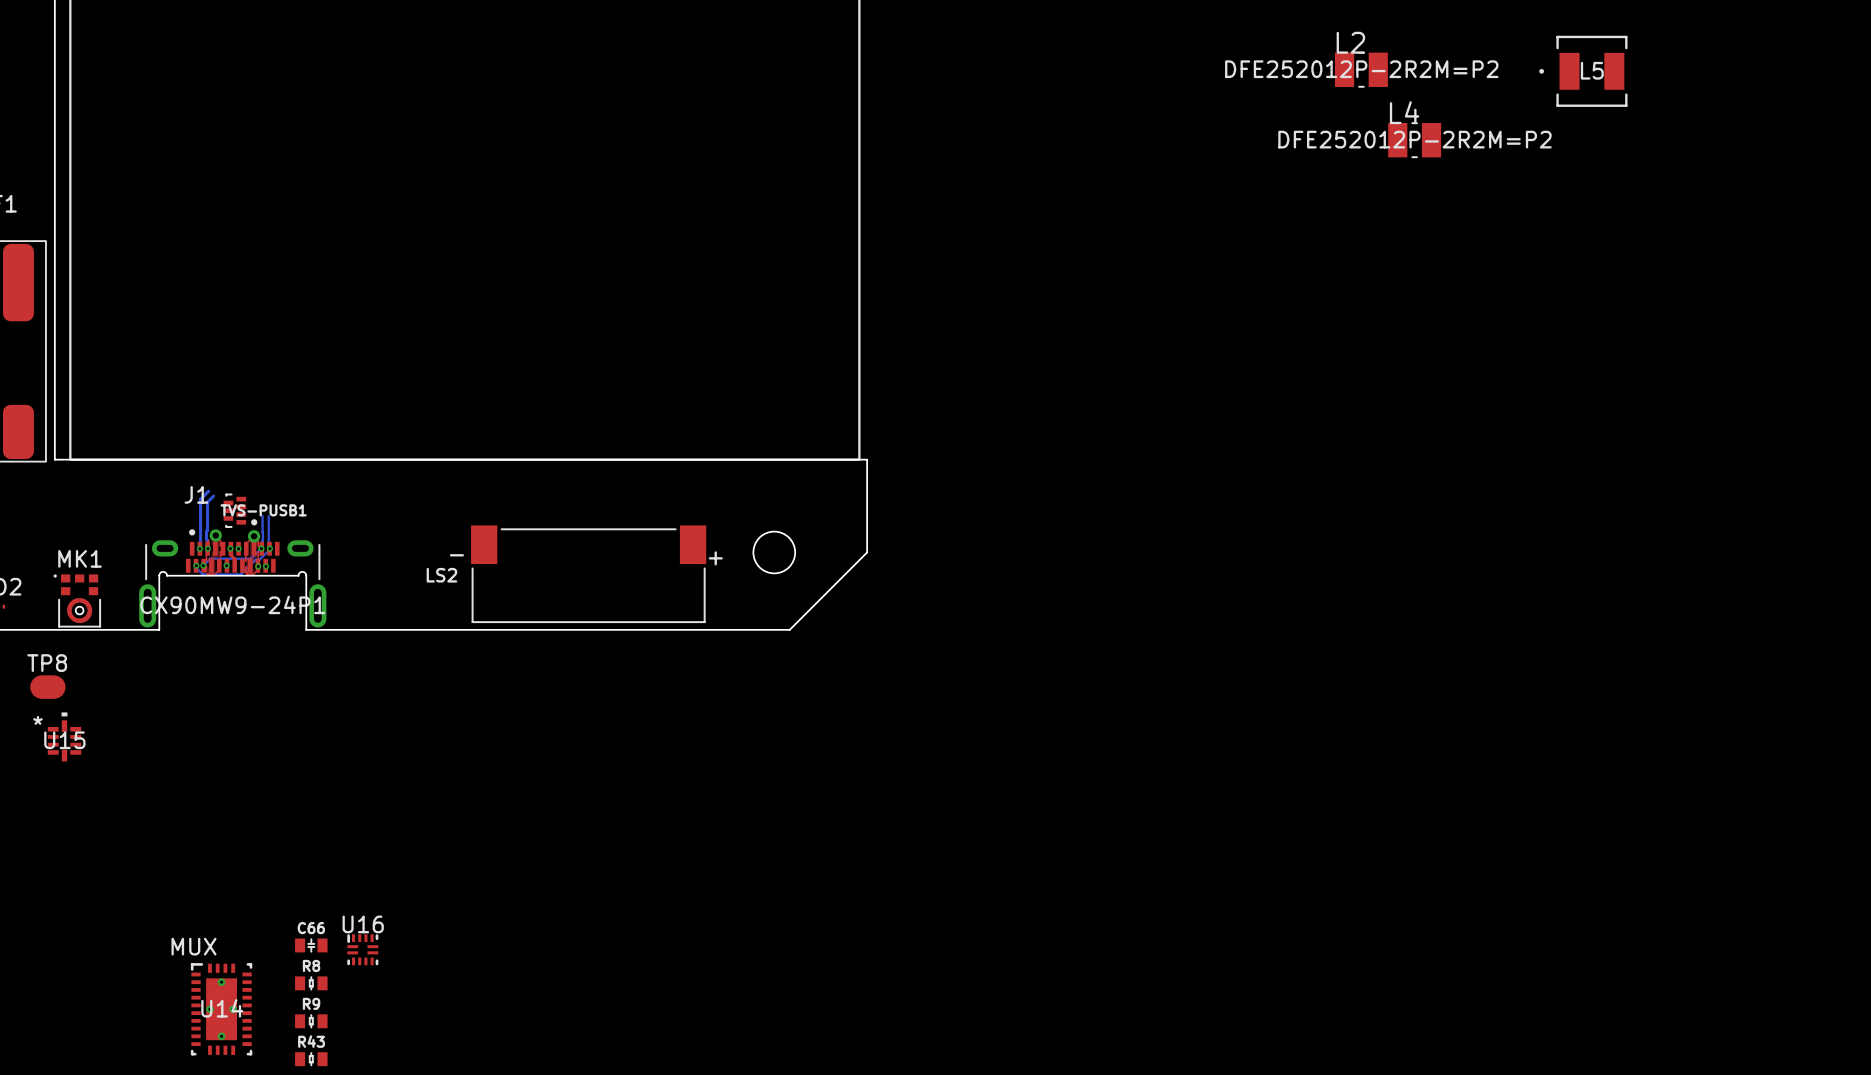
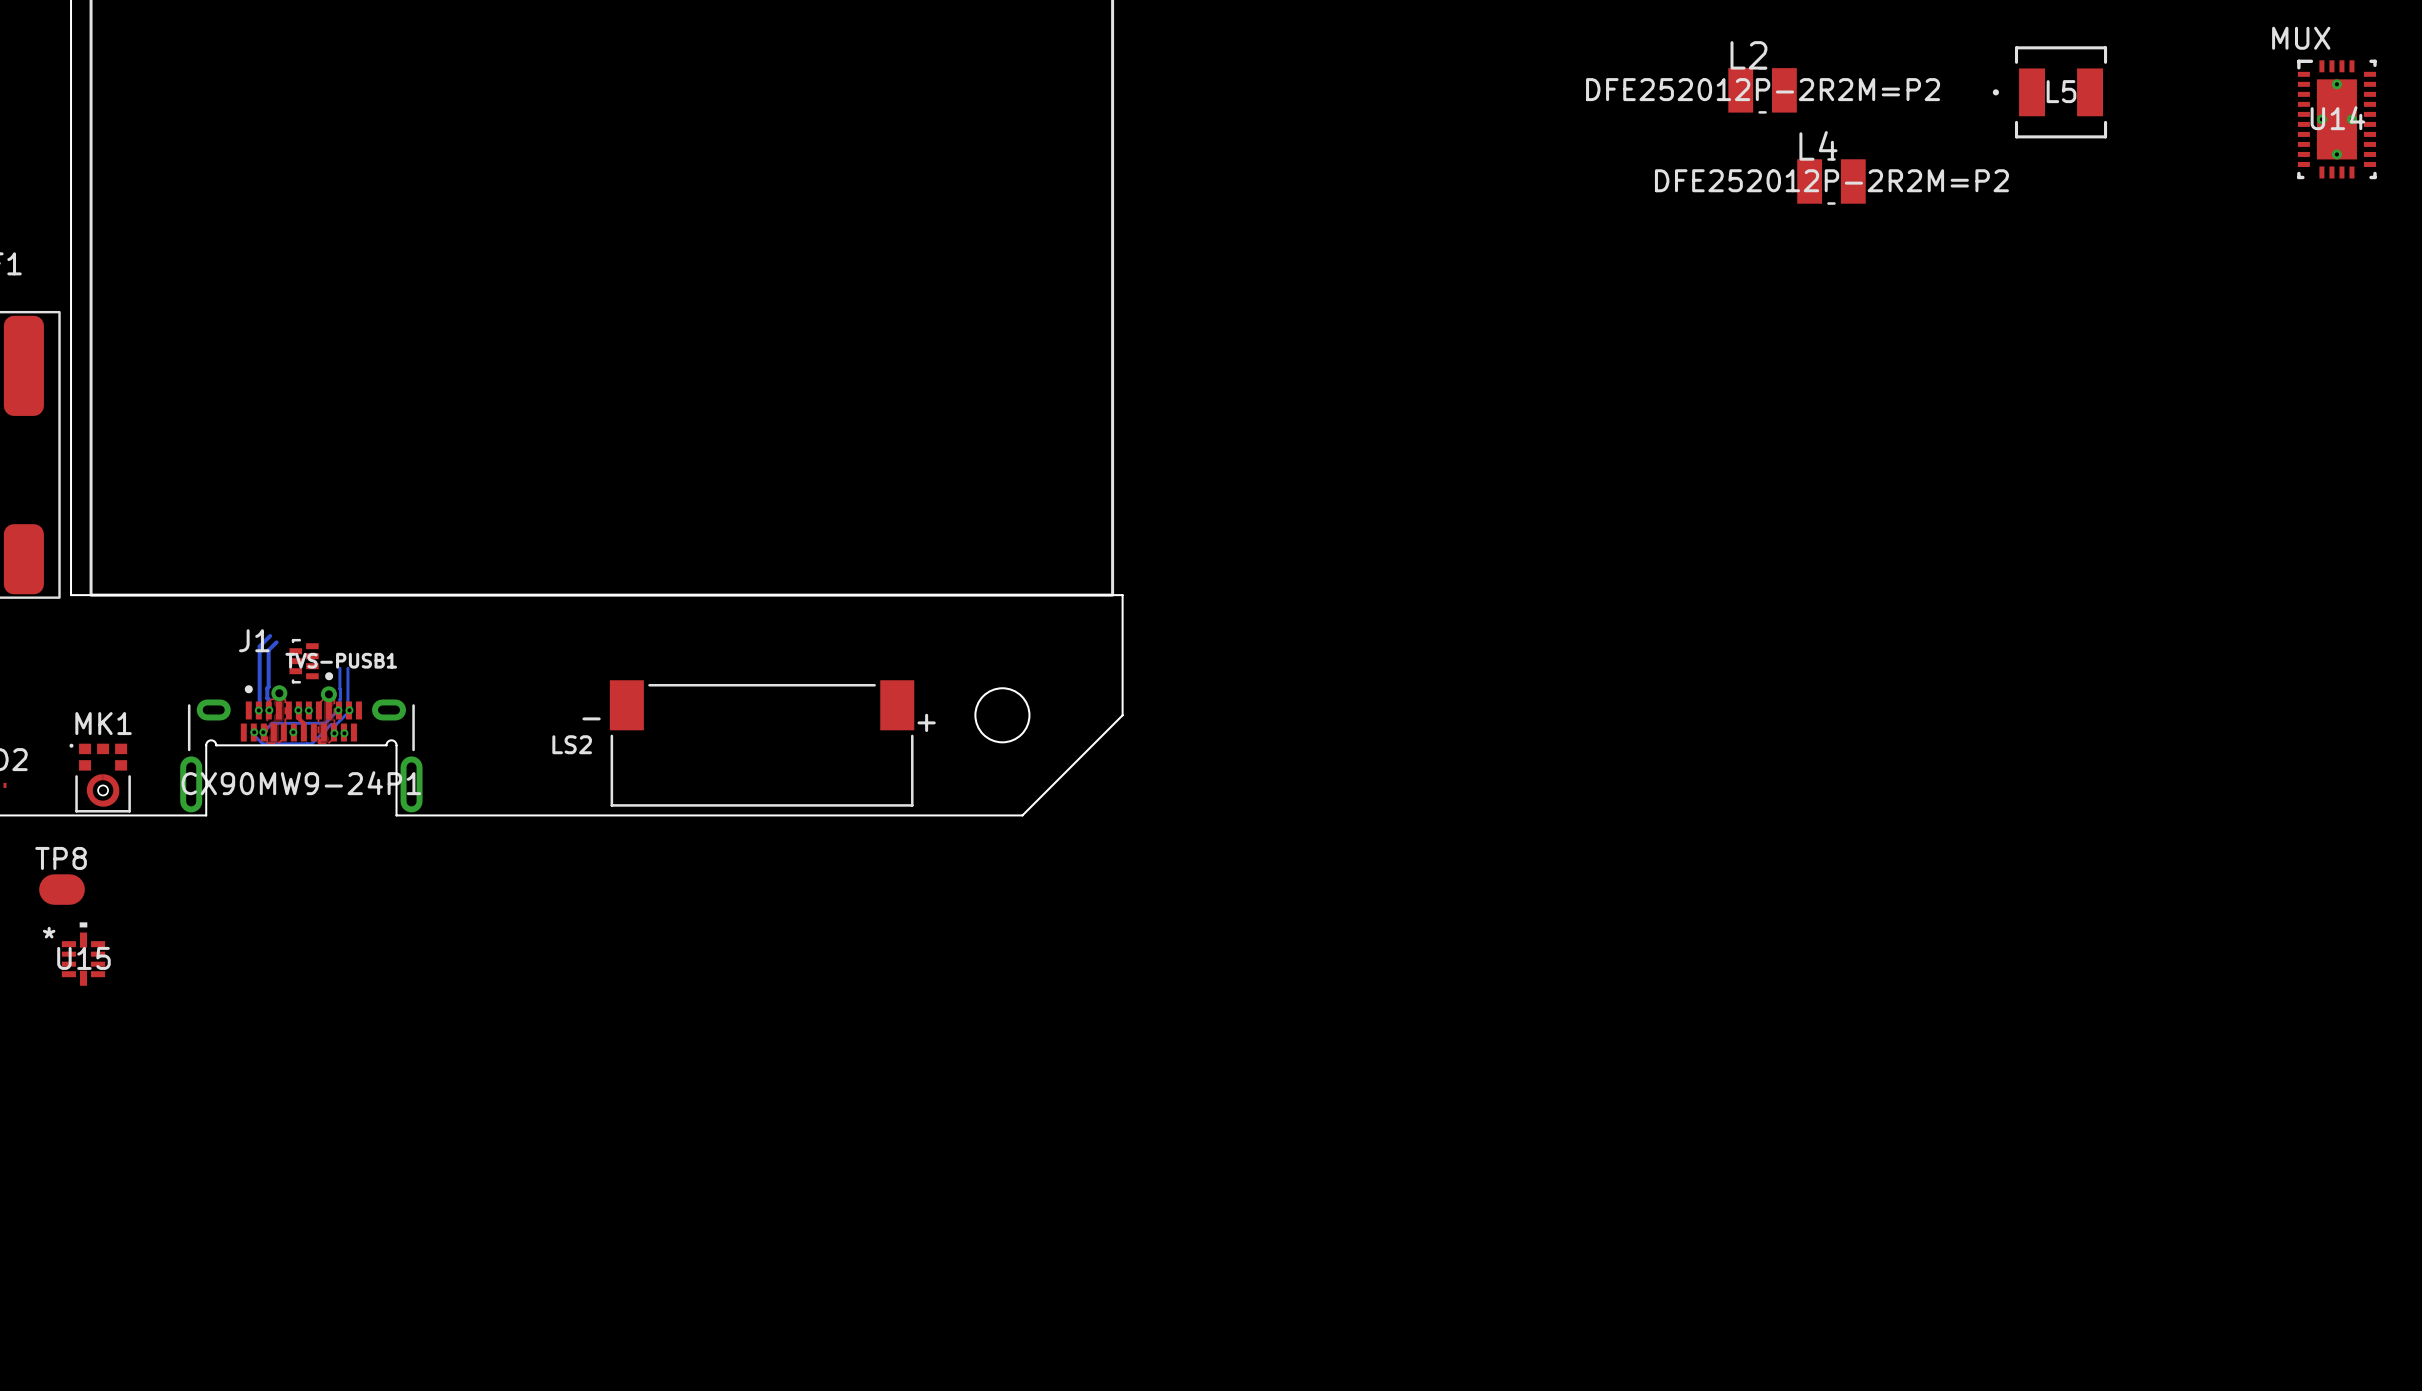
C66: (311, 945) -> none
U16: (362, 949) -> none
R8: (311, 983) -> none
U14 position: (221, 1009) -> (2336, 119)
R9: (311, 1021) -> none
R43: (311, 1059) -> none

